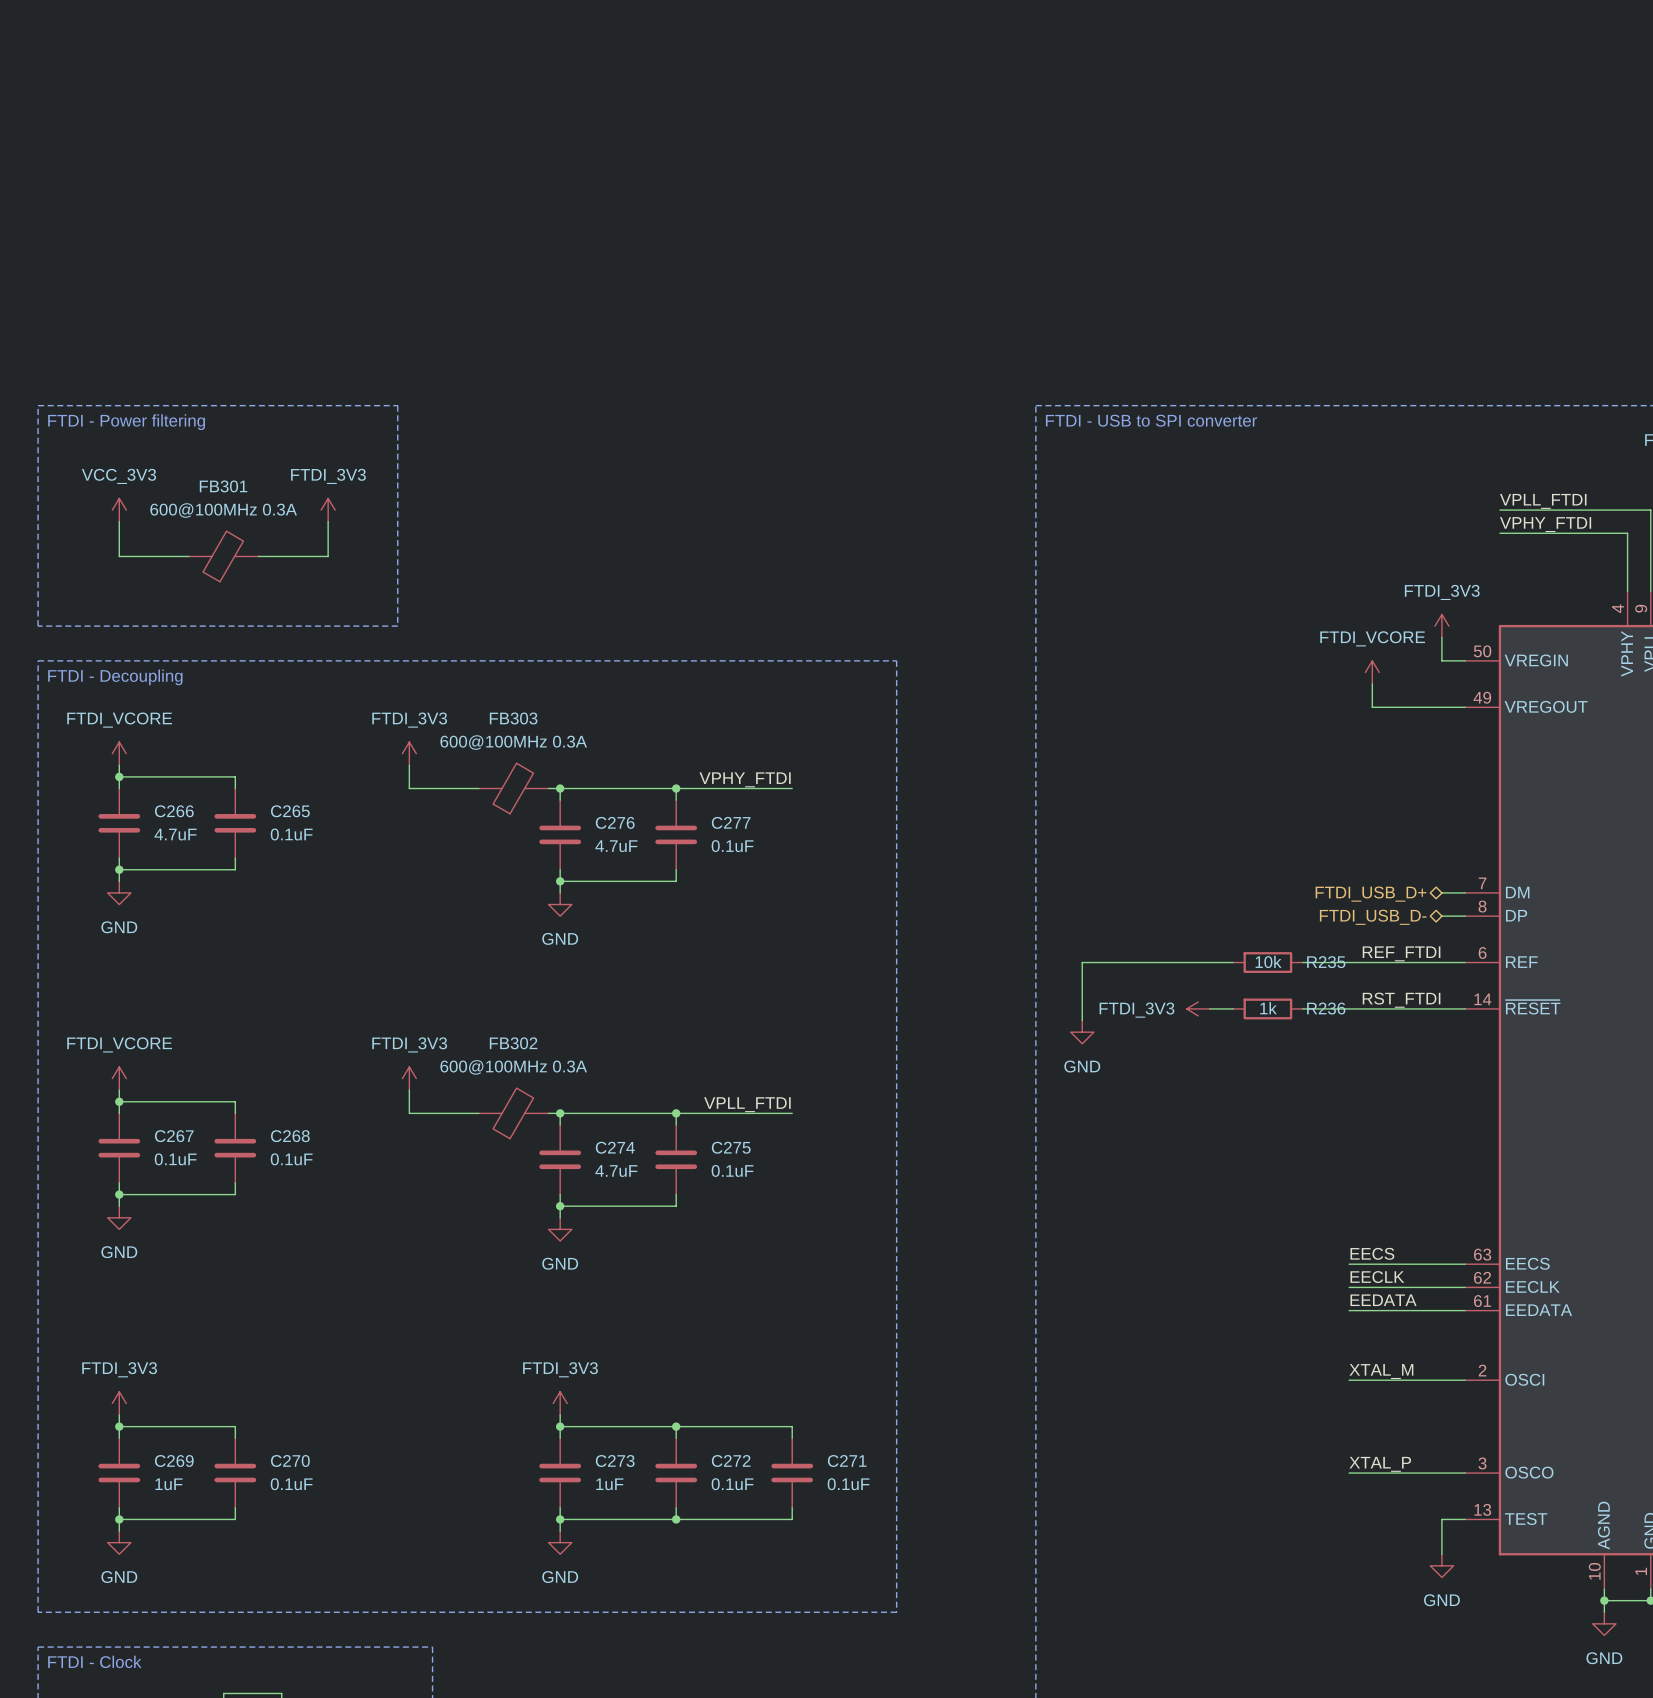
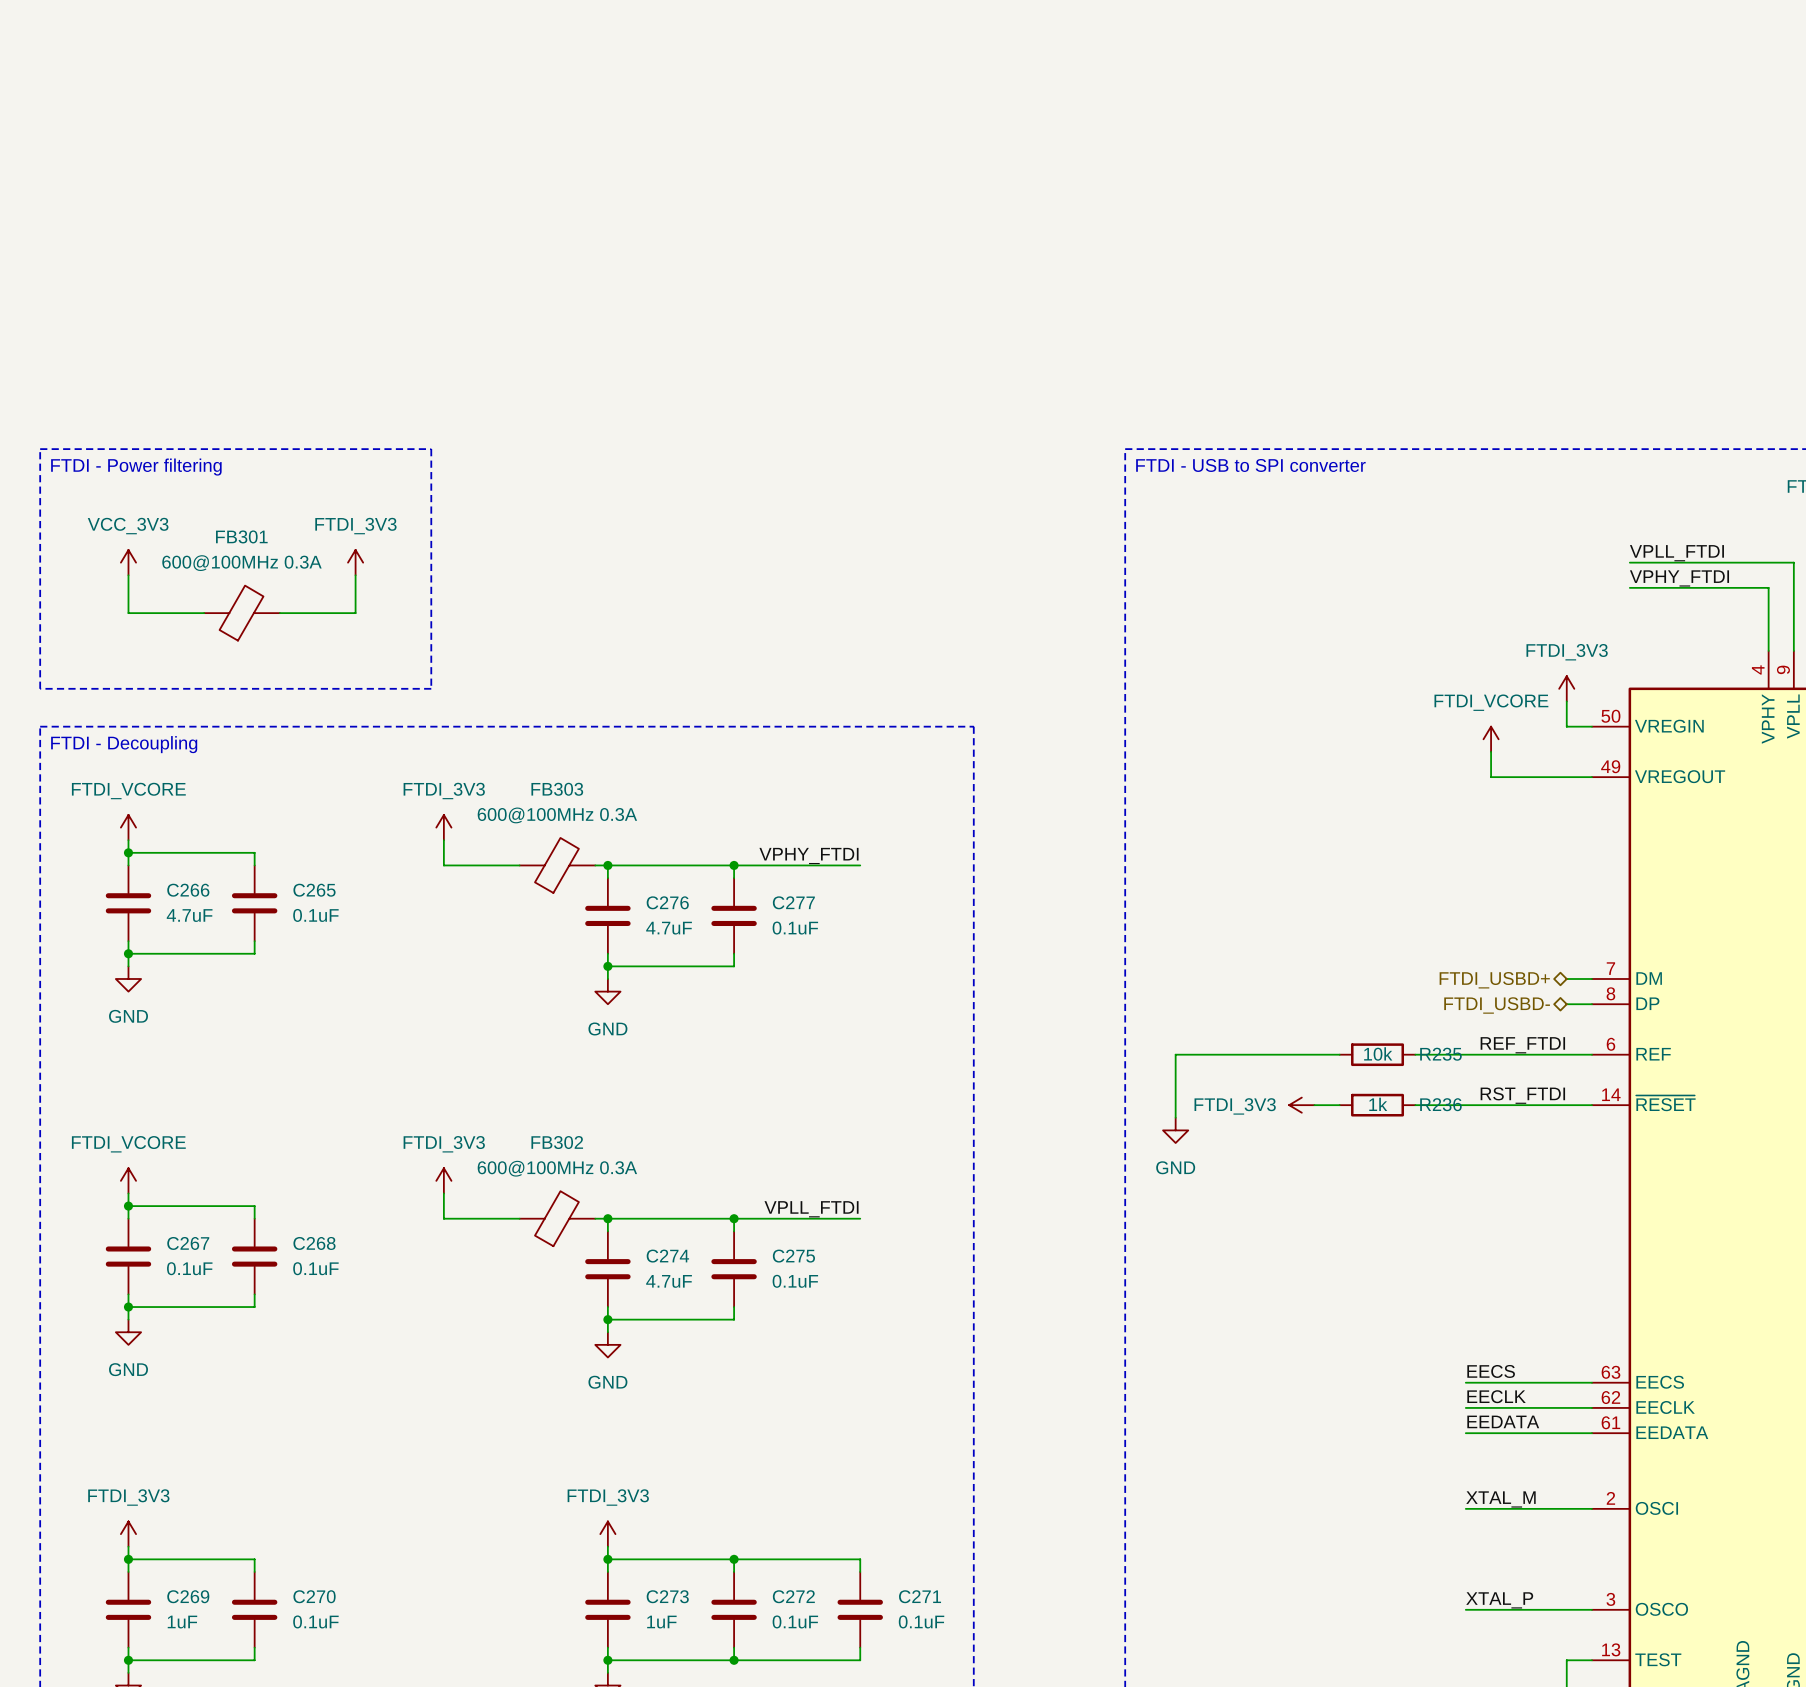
hierarchical label: FTDI_USB_D+ (1371, 894) -> FTDI_USBD+ (1494, 980)
hierarchical label: FTDI_USB_D- (1373, 917) -> FTDI_USBD- (1497, 1005)

